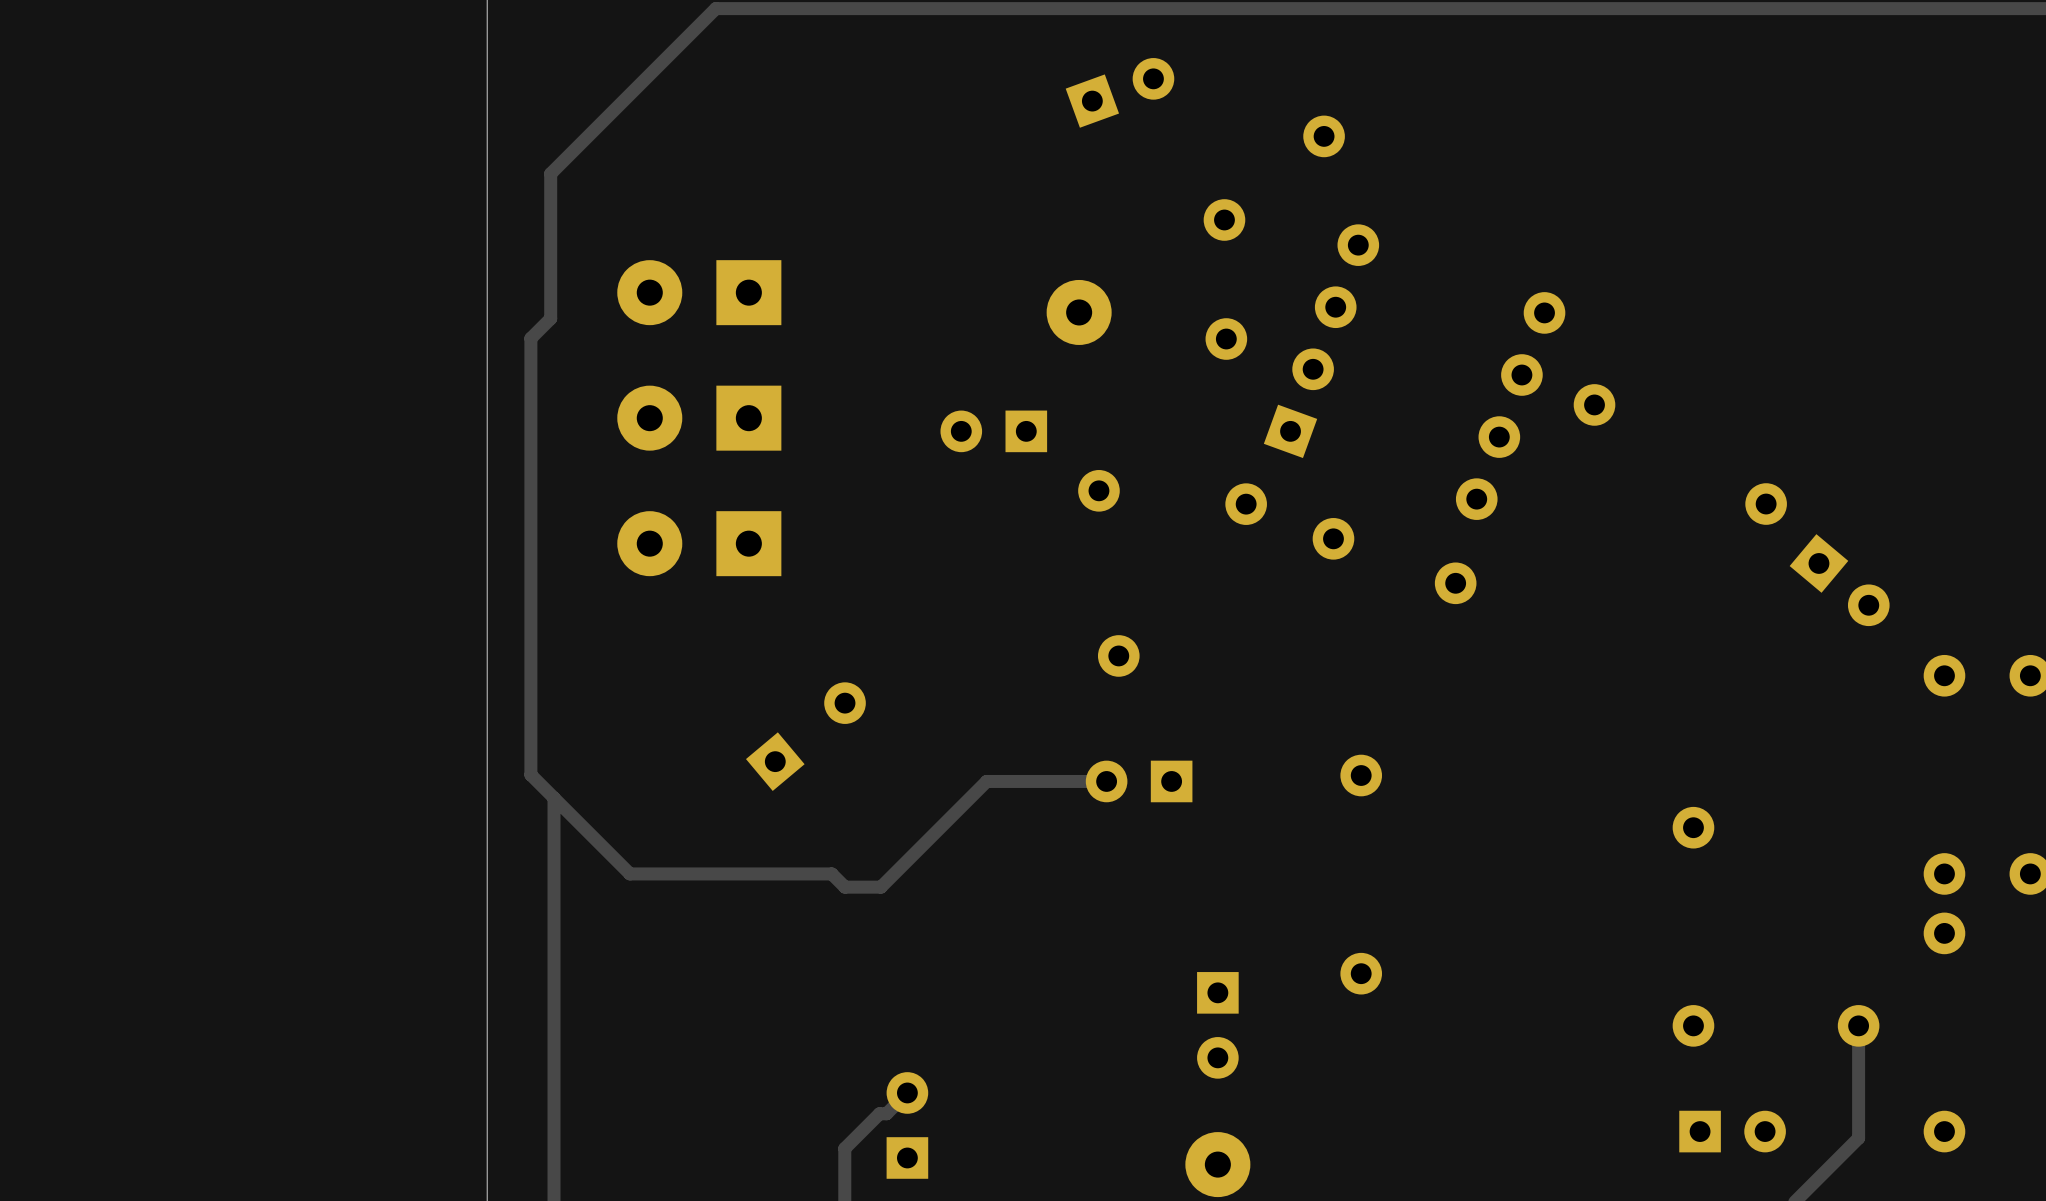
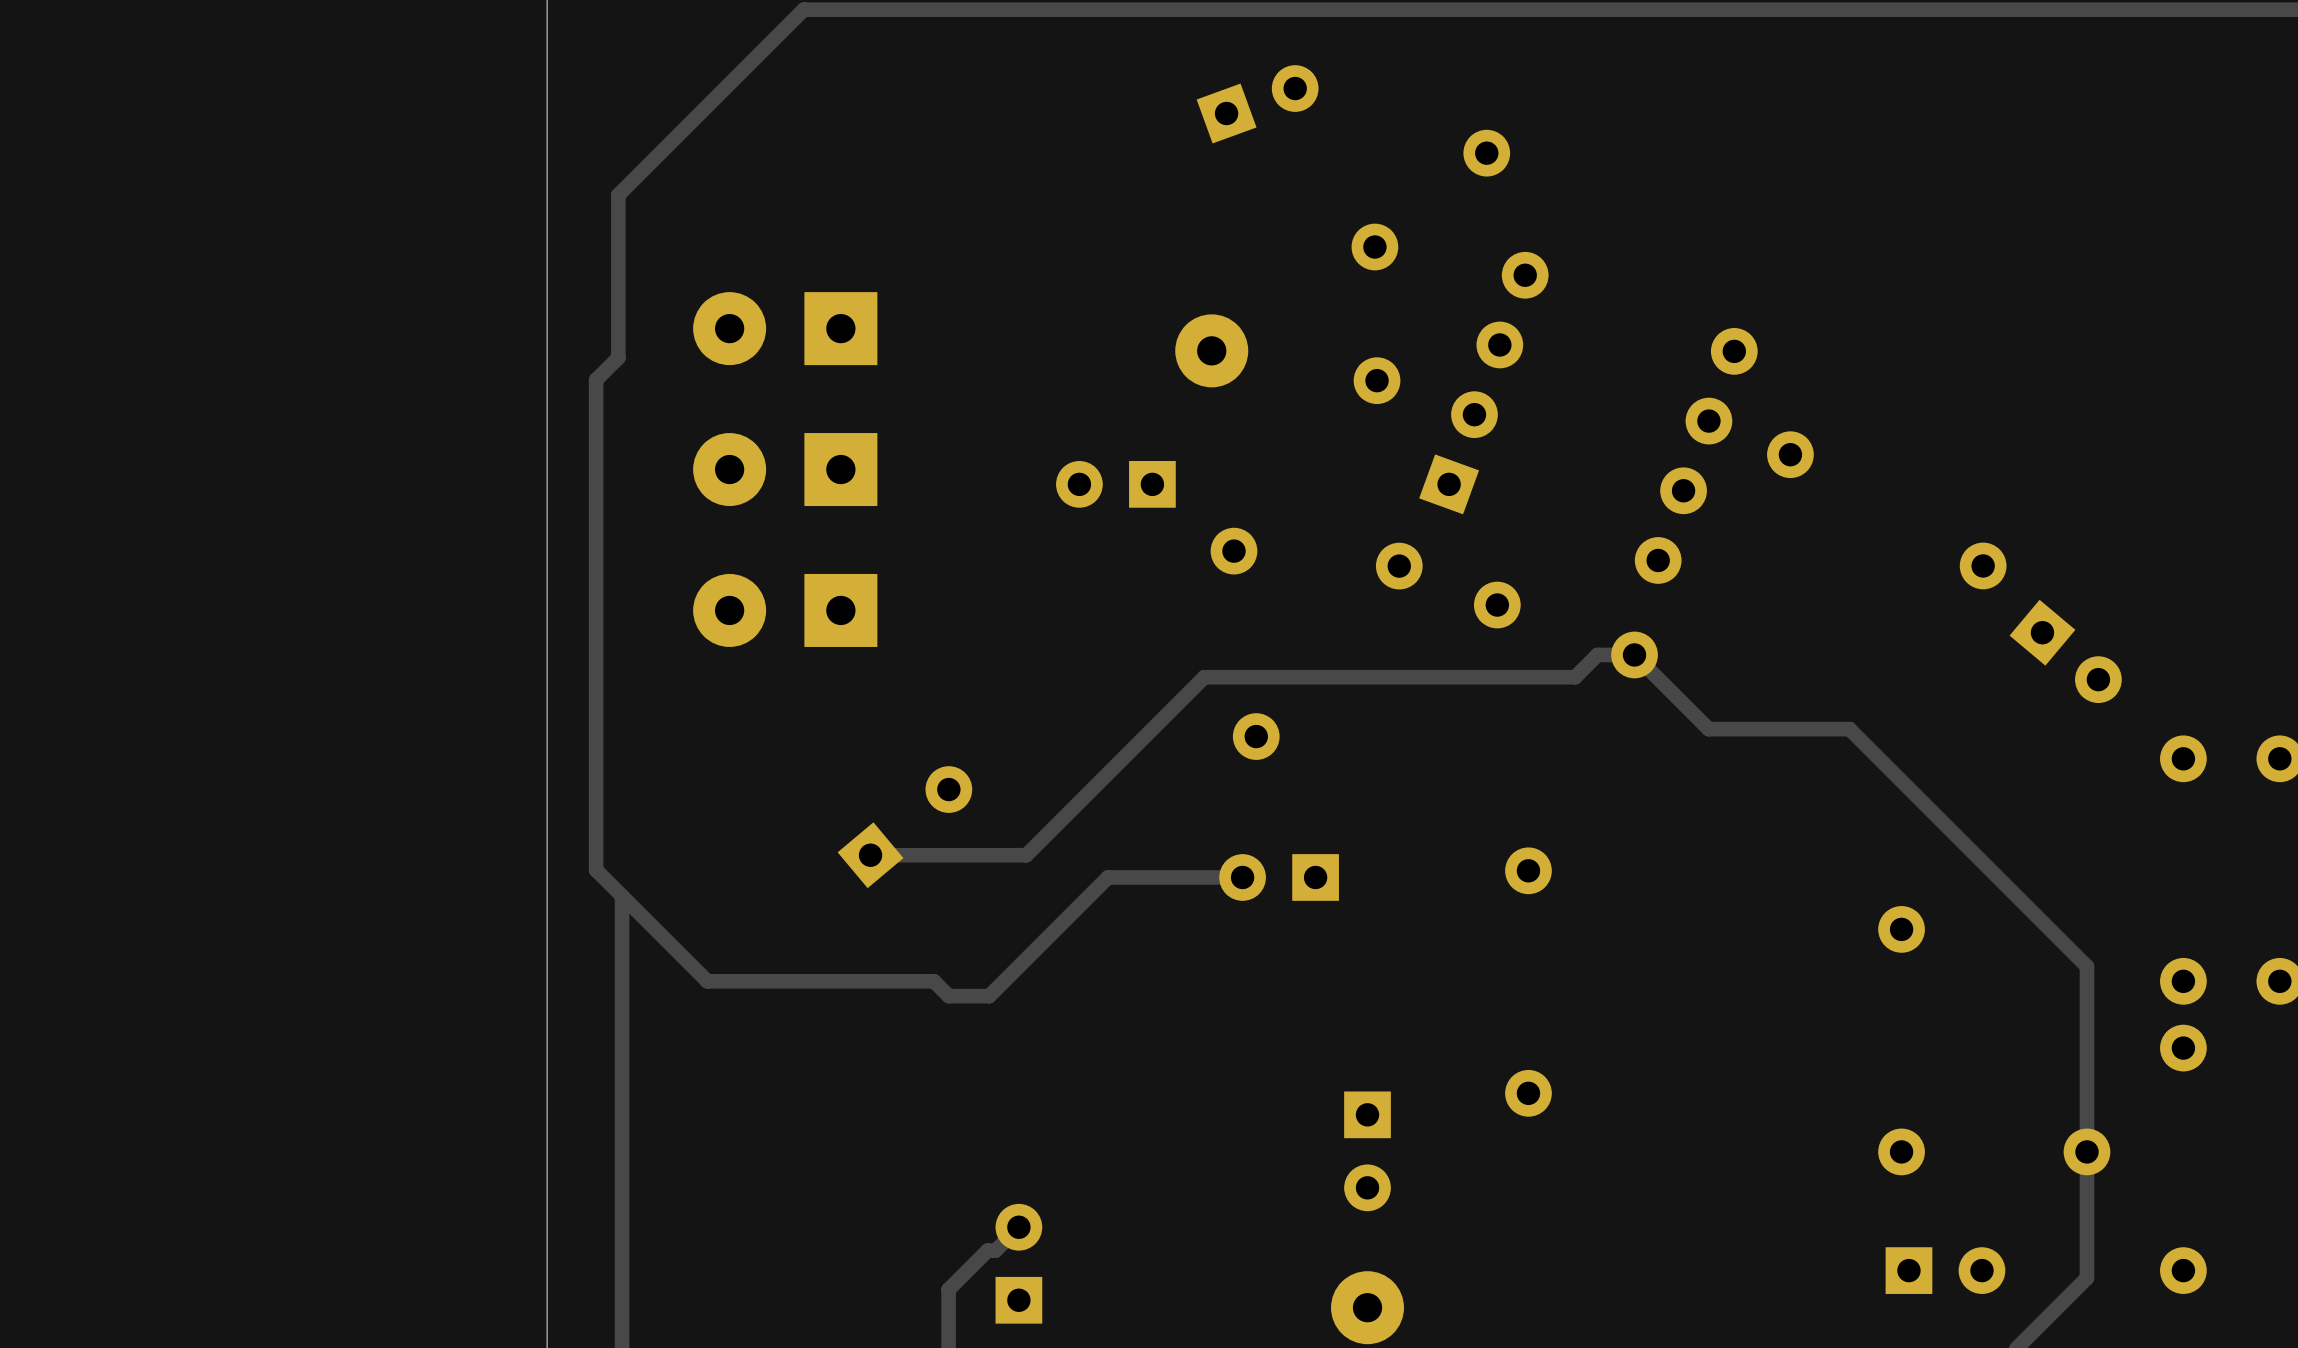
track: none -> (870, 855) (1026, 855) (1204, 677) (1575, 677) (1597, 654) (1634, 654) (1708, 729) (1849, 729) (2086, 966) (2086, 1151)

